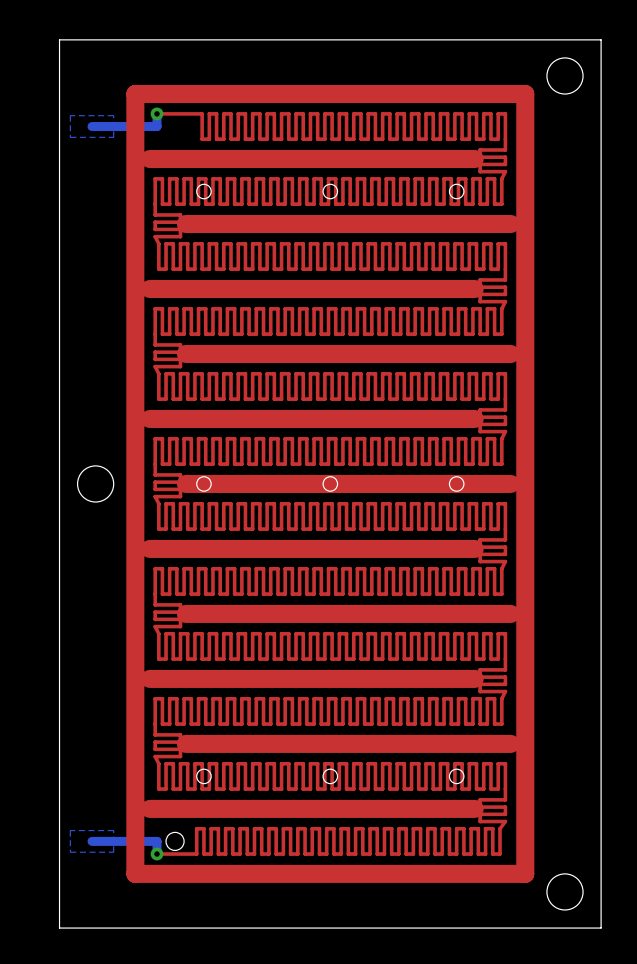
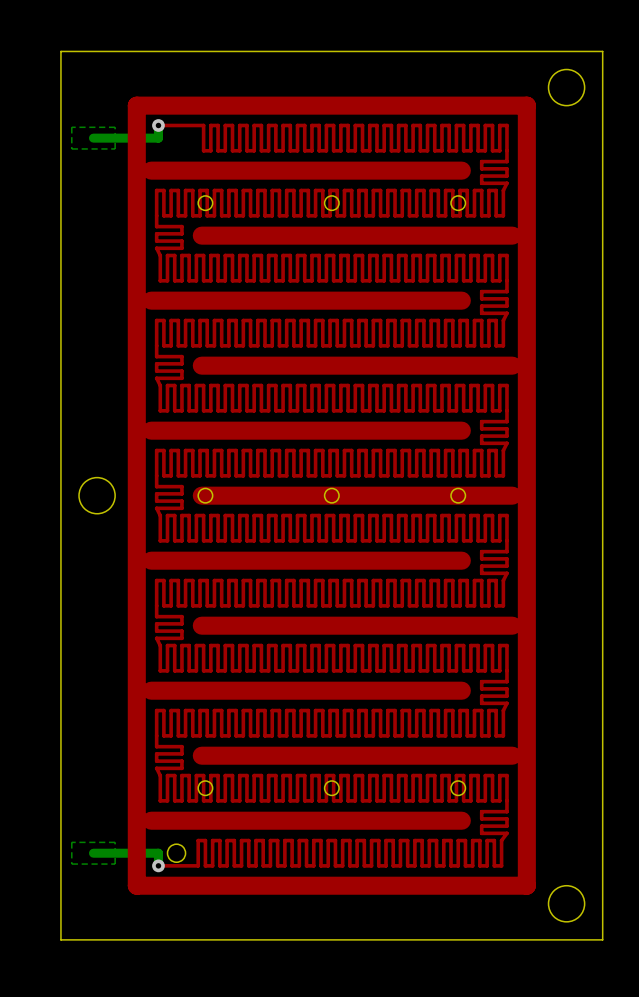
top track: (460, 159) (474, 159) -> none
top track: (185, 224) (200, 224) -> none
top track: (460, 288) (474, 288) -> none
top track: (185, 353) (200, 353) -> none
top track: (460, 418) (474, 418) -> none
top track: (185, 483) (200, 483) -> none
top track: (460, 548) (474, 548) -> none
top track: (185, 613) (200, 613) -> none
top track: (460, 678) (474, 678) -> none
top track: (185, 743) (200, 743) -> none
top track: (460, 808) (474, 808) -> none

